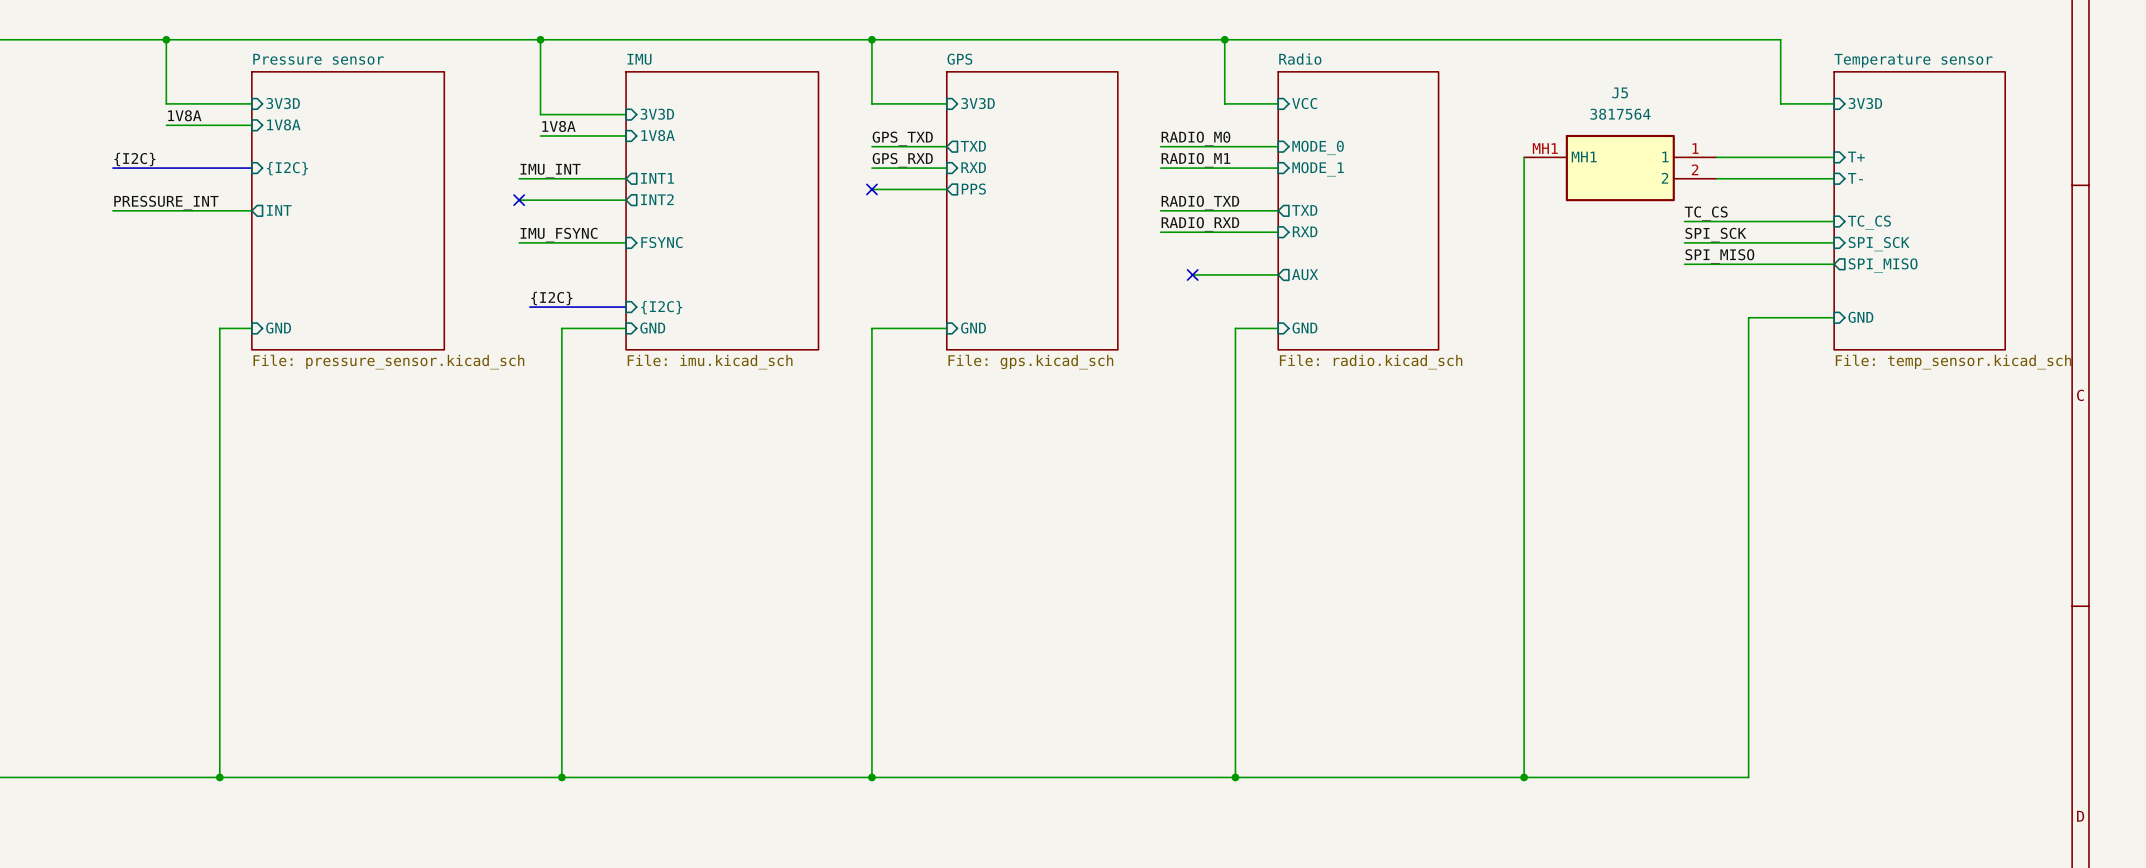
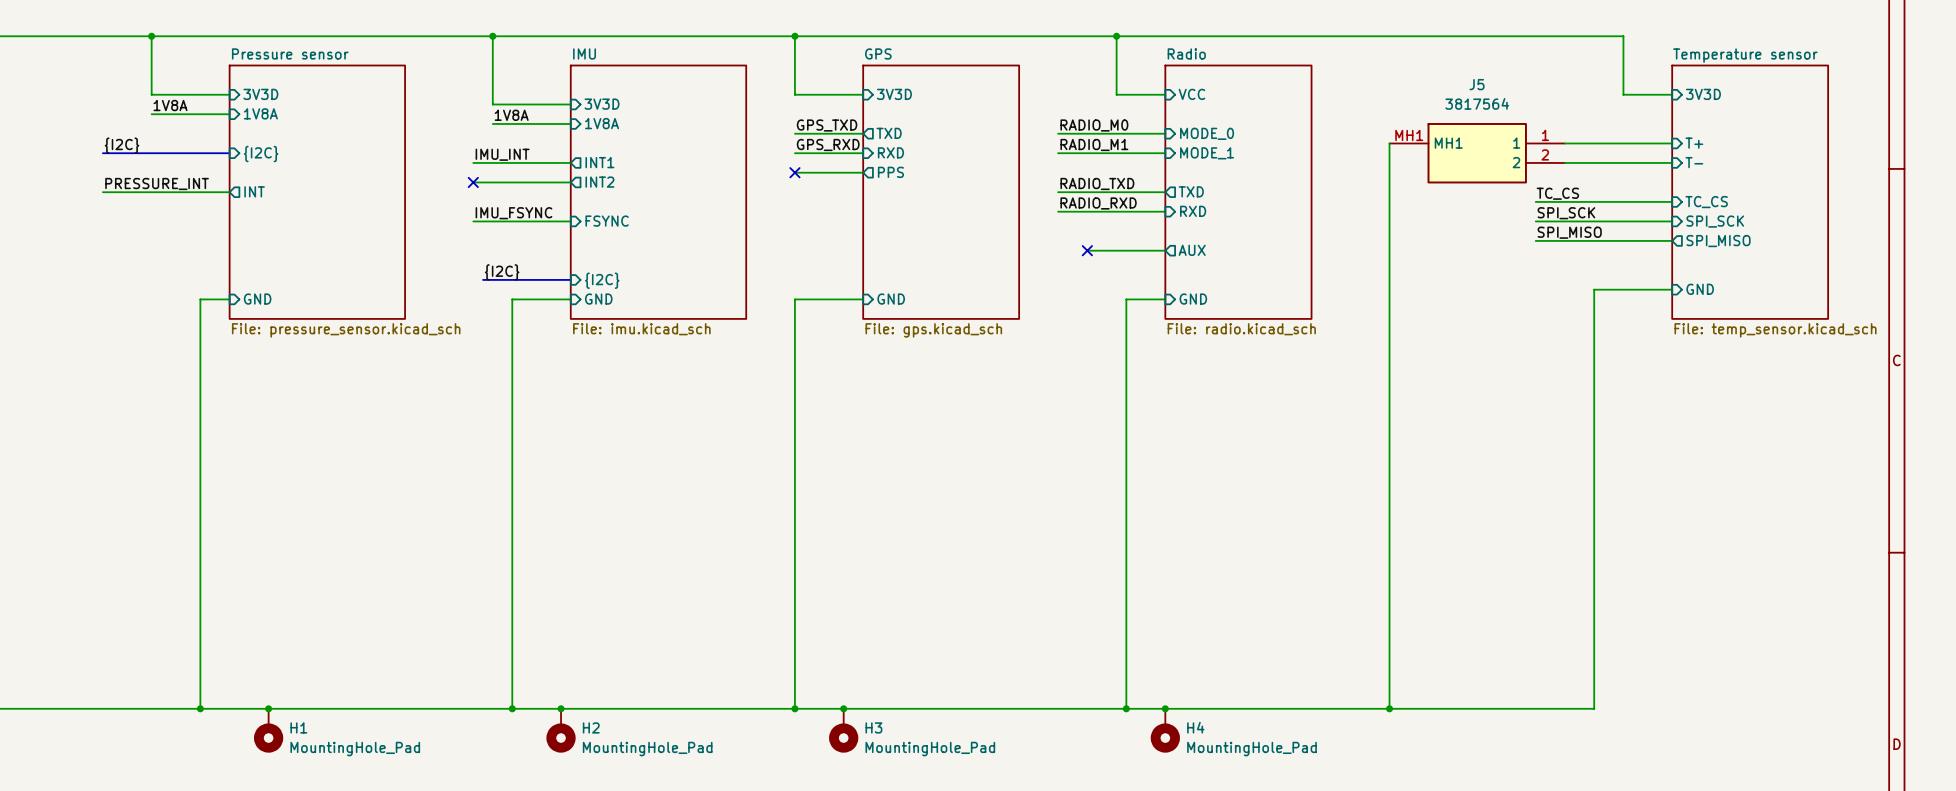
junction: none -> (268, 708)
junction: none -> (561, 708)
junction: none -> (843, 708)
junction: none -> (1165, 708)
H1: none -> MountingHole_Pad (268, 730)
H2: none -> MountingHole_Pad (561, 730)
H3: none -> MountingHole_Pad (843, 730)
H4: none -> MountingHole_Pad (1165, 730)

